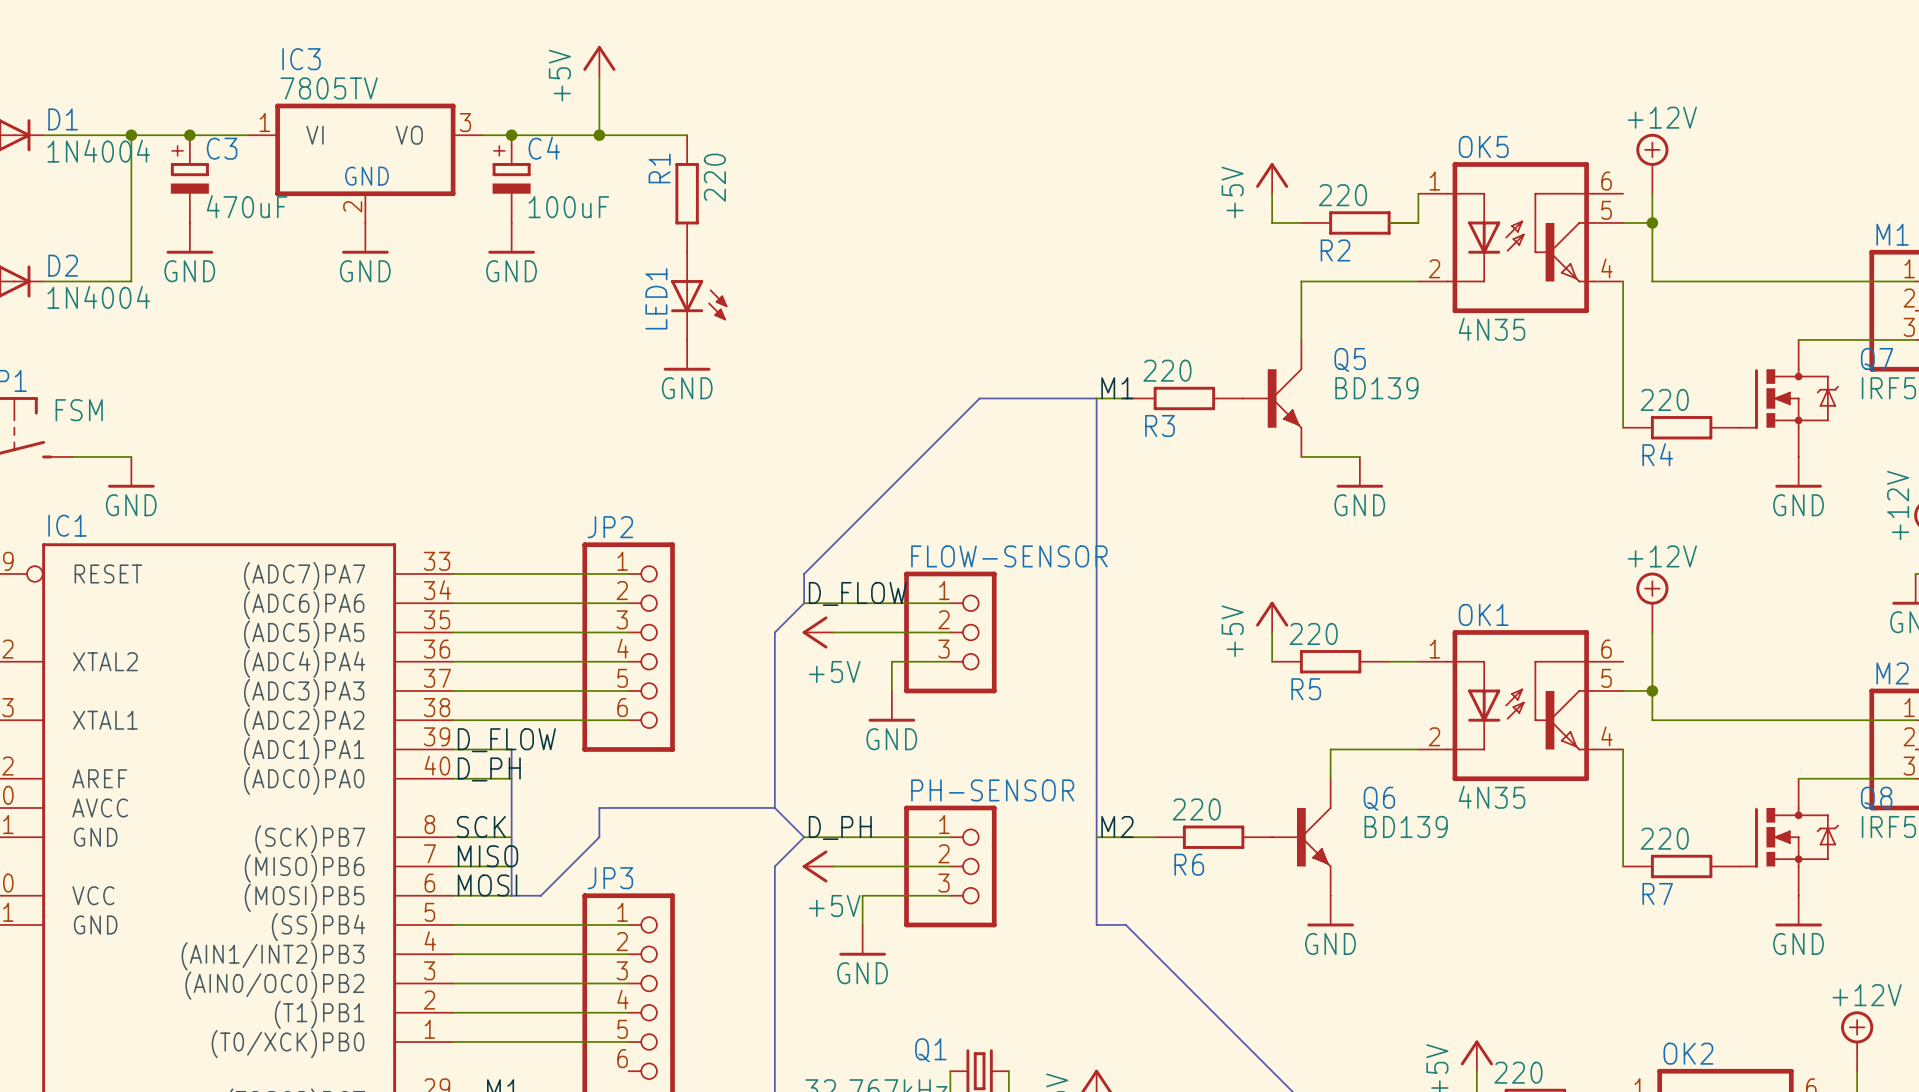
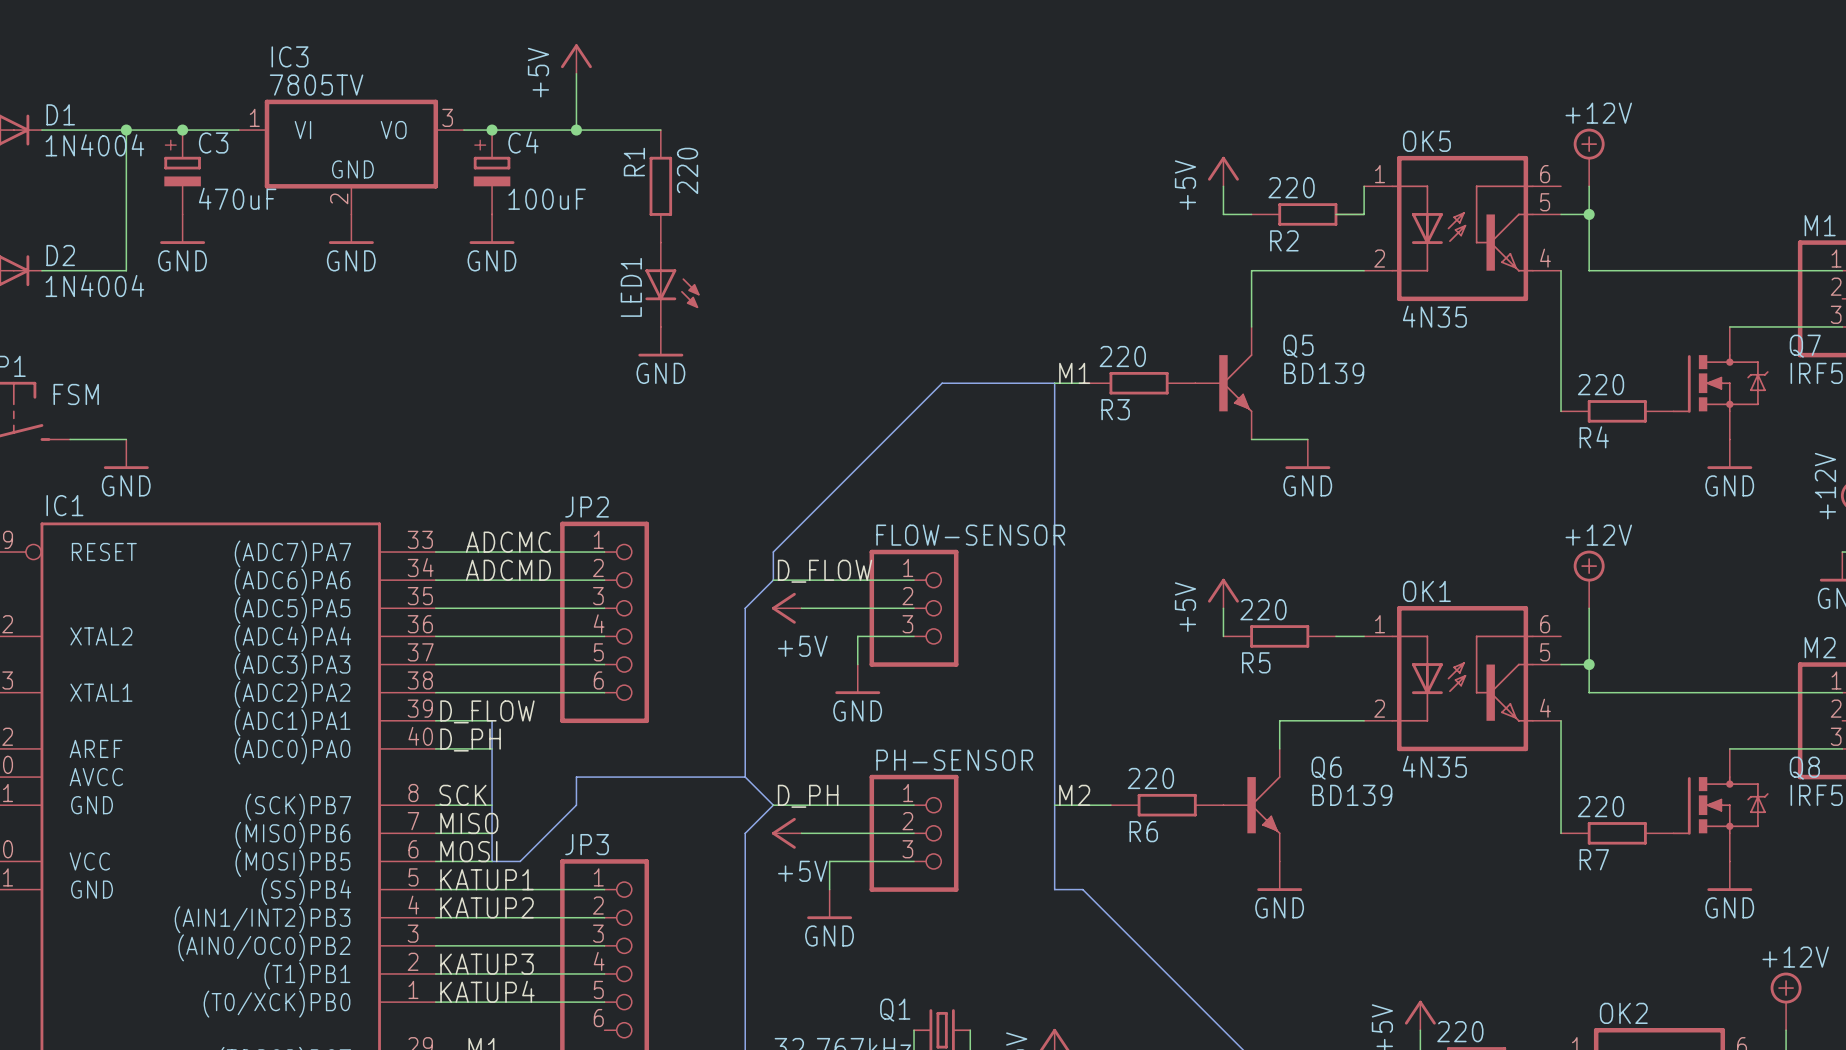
label: none -> ADCMC (508, 542)
label: none -> ADCMD (508, 570)
label: none -> KATUP1 (487, 879)
label: none -> KATUP2 (487, 907)
label: none -> KATUP3 (487, 964)
label: none -> KATUP4 (487, 991)

